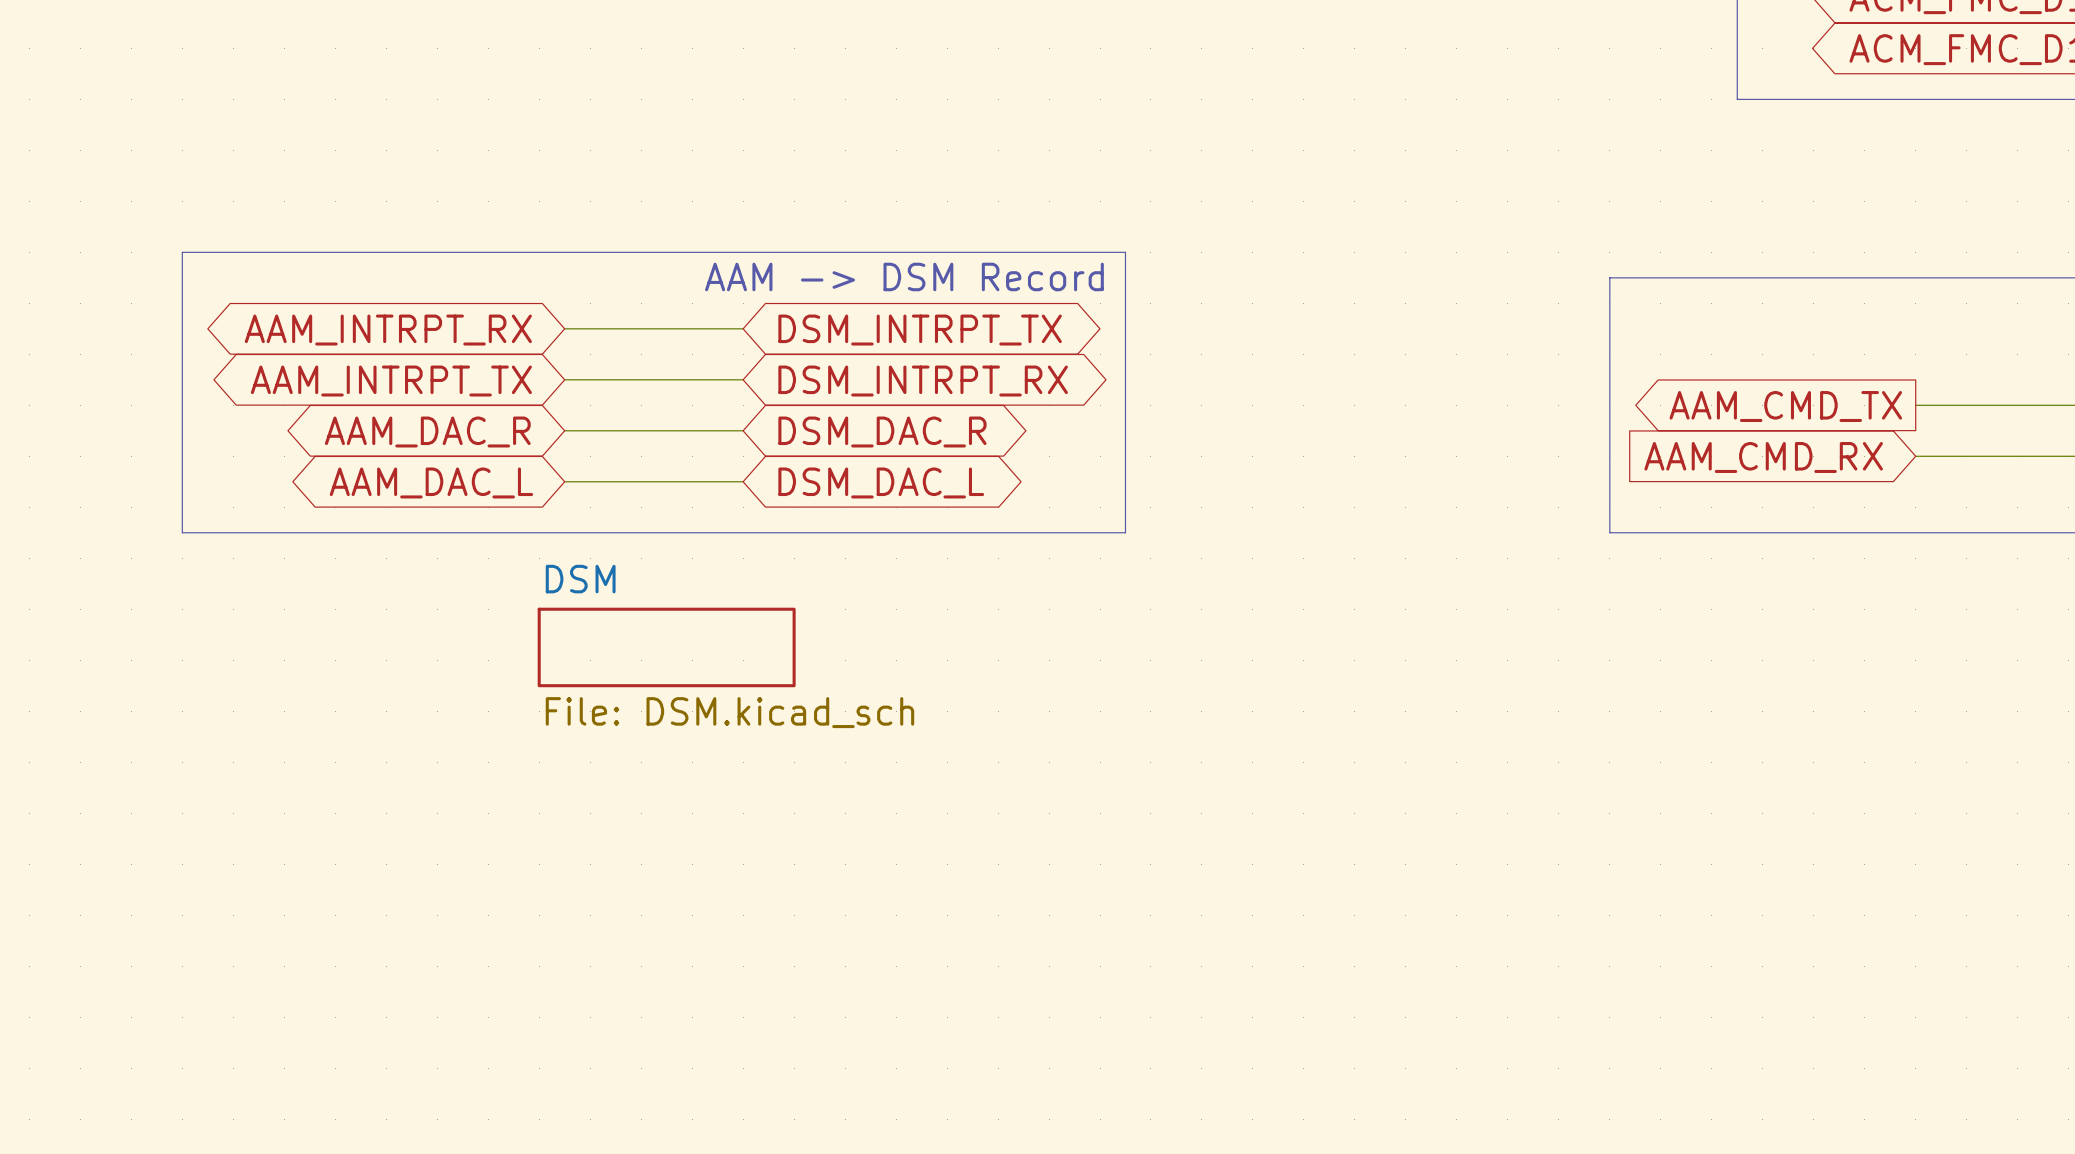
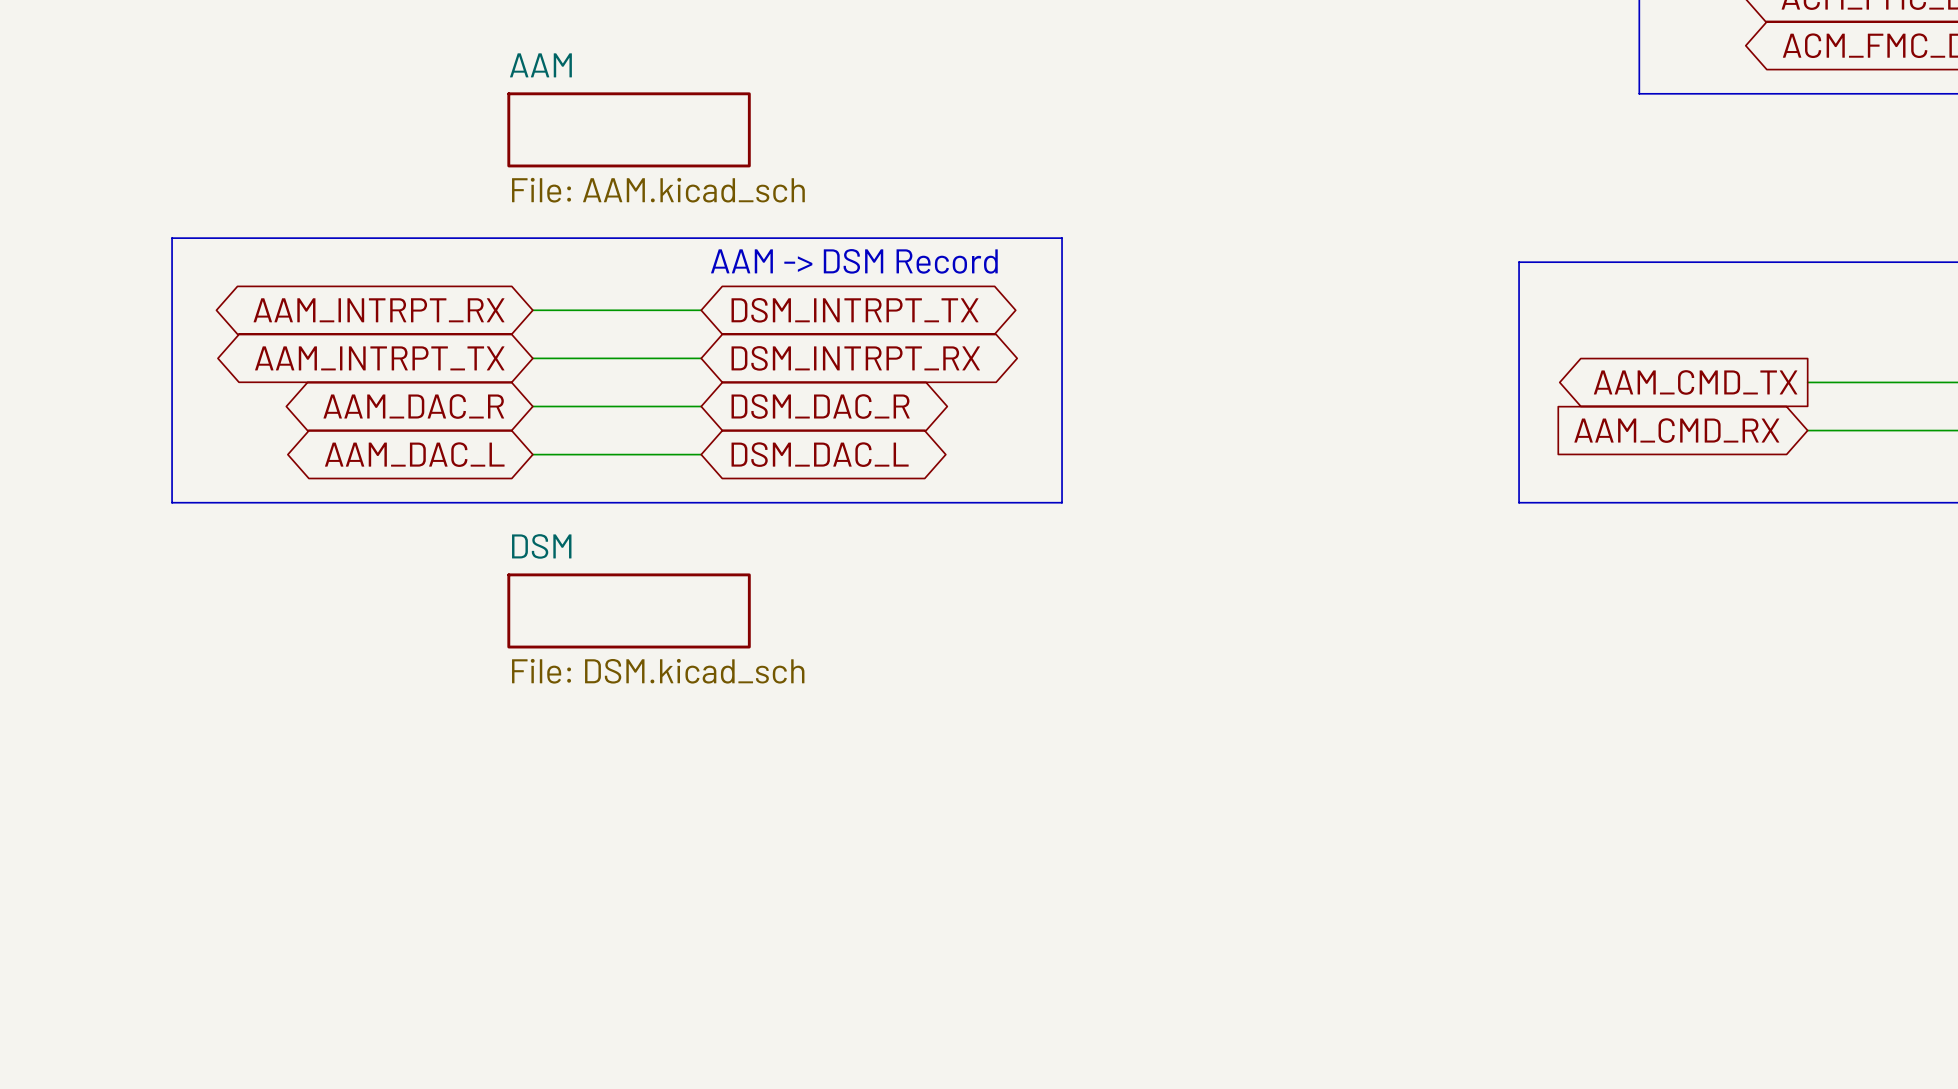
sheet AAM: none -> File: AAM.kicad_sch (629, 129)

